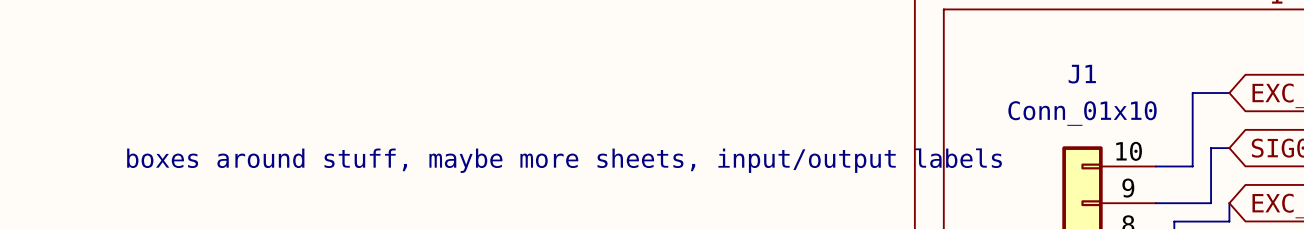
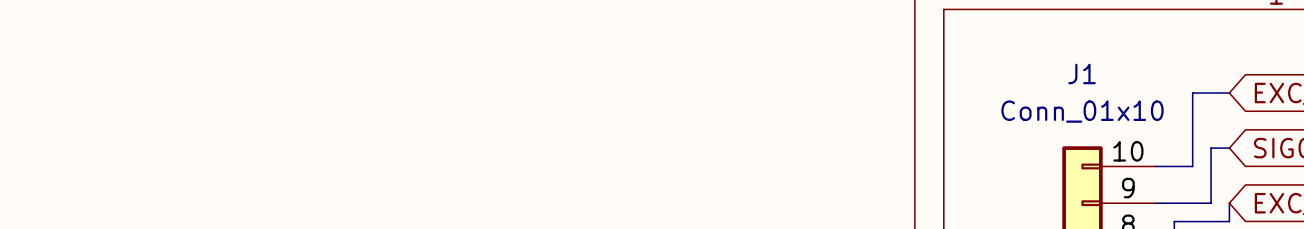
text: boxes around stuff, maybe more sheets, input/output labels (564, 160) -> none

